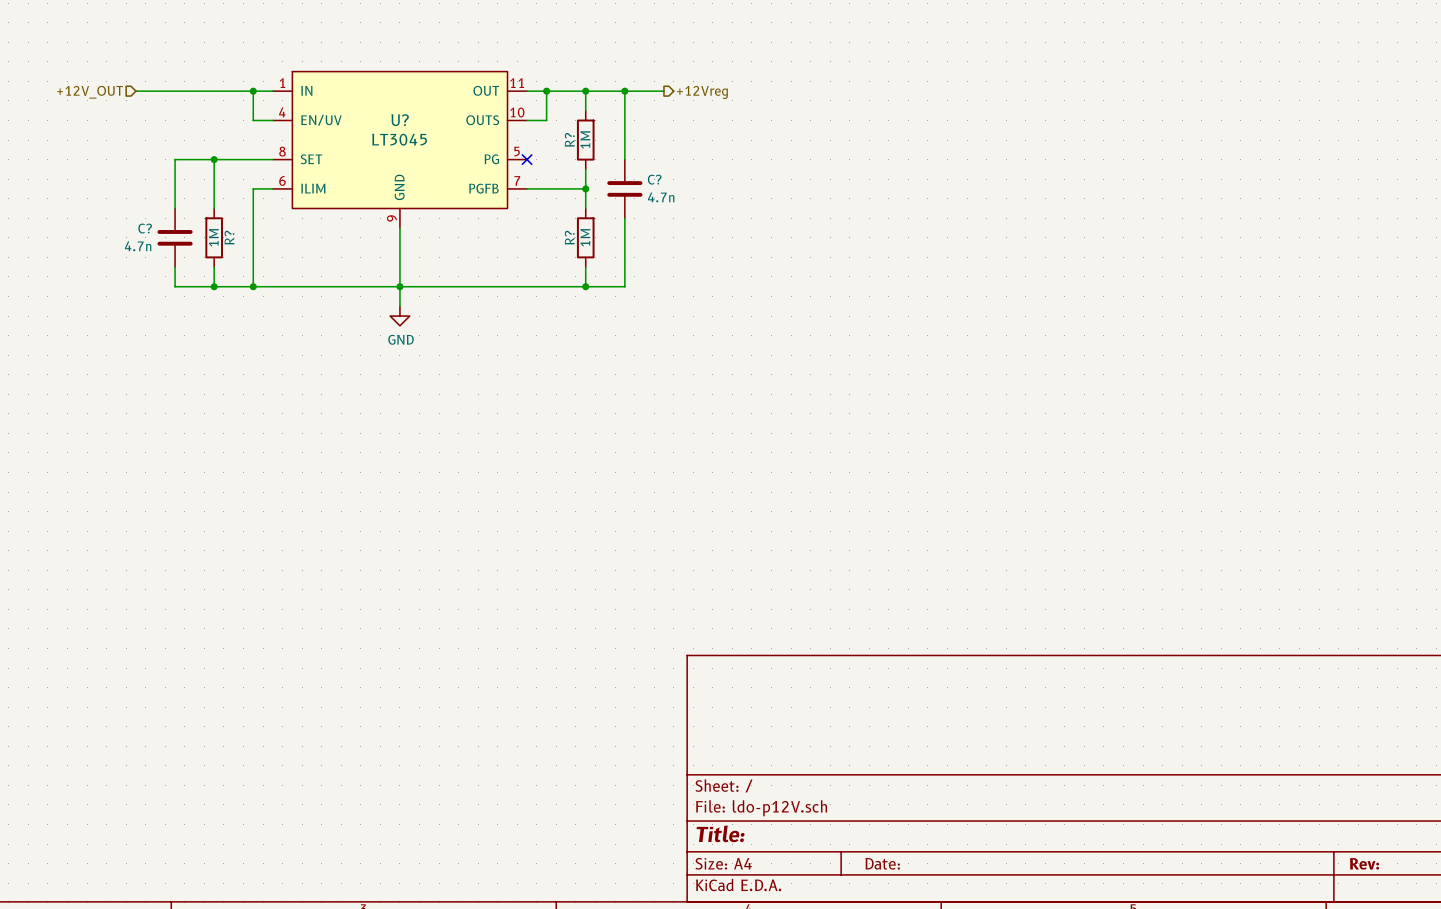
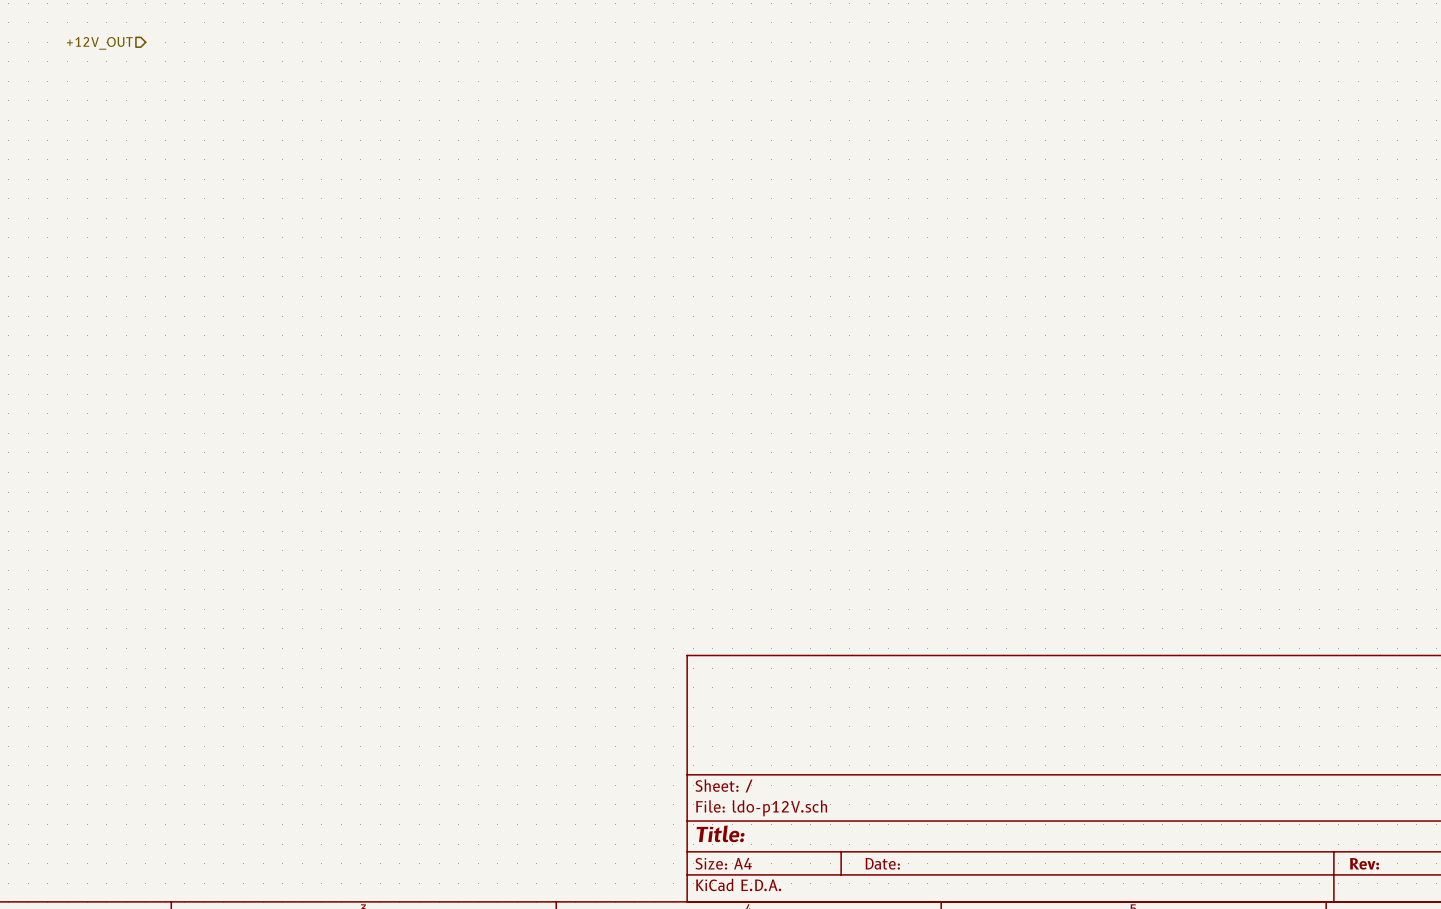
wire: (135, 91) (272, 91) -> none
wire: (253, 91) (253, 120) (272, 120) -> none
junction: (253, 91) -> none
wire: (527, 91) (663, 91) -> none
wire: (546, 91) (546, 120) (527, 120) -> none
junction: (546, 91) -> none
wire: (585, 91) (585, 110) -> none
junction: (585, 91) -> none
wire: (624, 91) (624, 159) -> none
junction: (624, 91) -> none
hierarchical label position: +12V_OUT (90, 92) -> +12V_OUT (99, 43)
hierarchical label: +12Vreg (702, 92) -> none
R?: 1M (585, 140) -> none
U?: LT3045 (399, 149) -> none
wire: (214, 159) (214, 208) -> none
junction: (214, 159) -> none
wire: (272, 159) (175, 159) (175, 208) -> none
no-connect mark: (527, 159) -> none
wire: (585, 169) (585, 208) -> none
wire: (272, 188) (253, 188) (253, 286) -> none
wire: (527, 188) (585, 188) -> none
junction: (585, 188) -> none
C?: 4.7n (624, 188) -> none
wire: (624, 218) (624, 286) (175, 286) (175, 267) -> none
wire: (399, 228) (399, 306) -> none
C?: 4.7n (175, 237) -> none
R?: 1M (214, 237) -> none
R?: 1M (585, 237) -> none
wire: (214, 267) (214, 286) -> none
wire: (585, 267) (585, 286) -> none
junction: (214, 286) -> none
junction: (253, 286) -> none
junction: (399, 286) -> none
junction: (585, 286) -> none
power symbol: GND (399, 316) -> none

